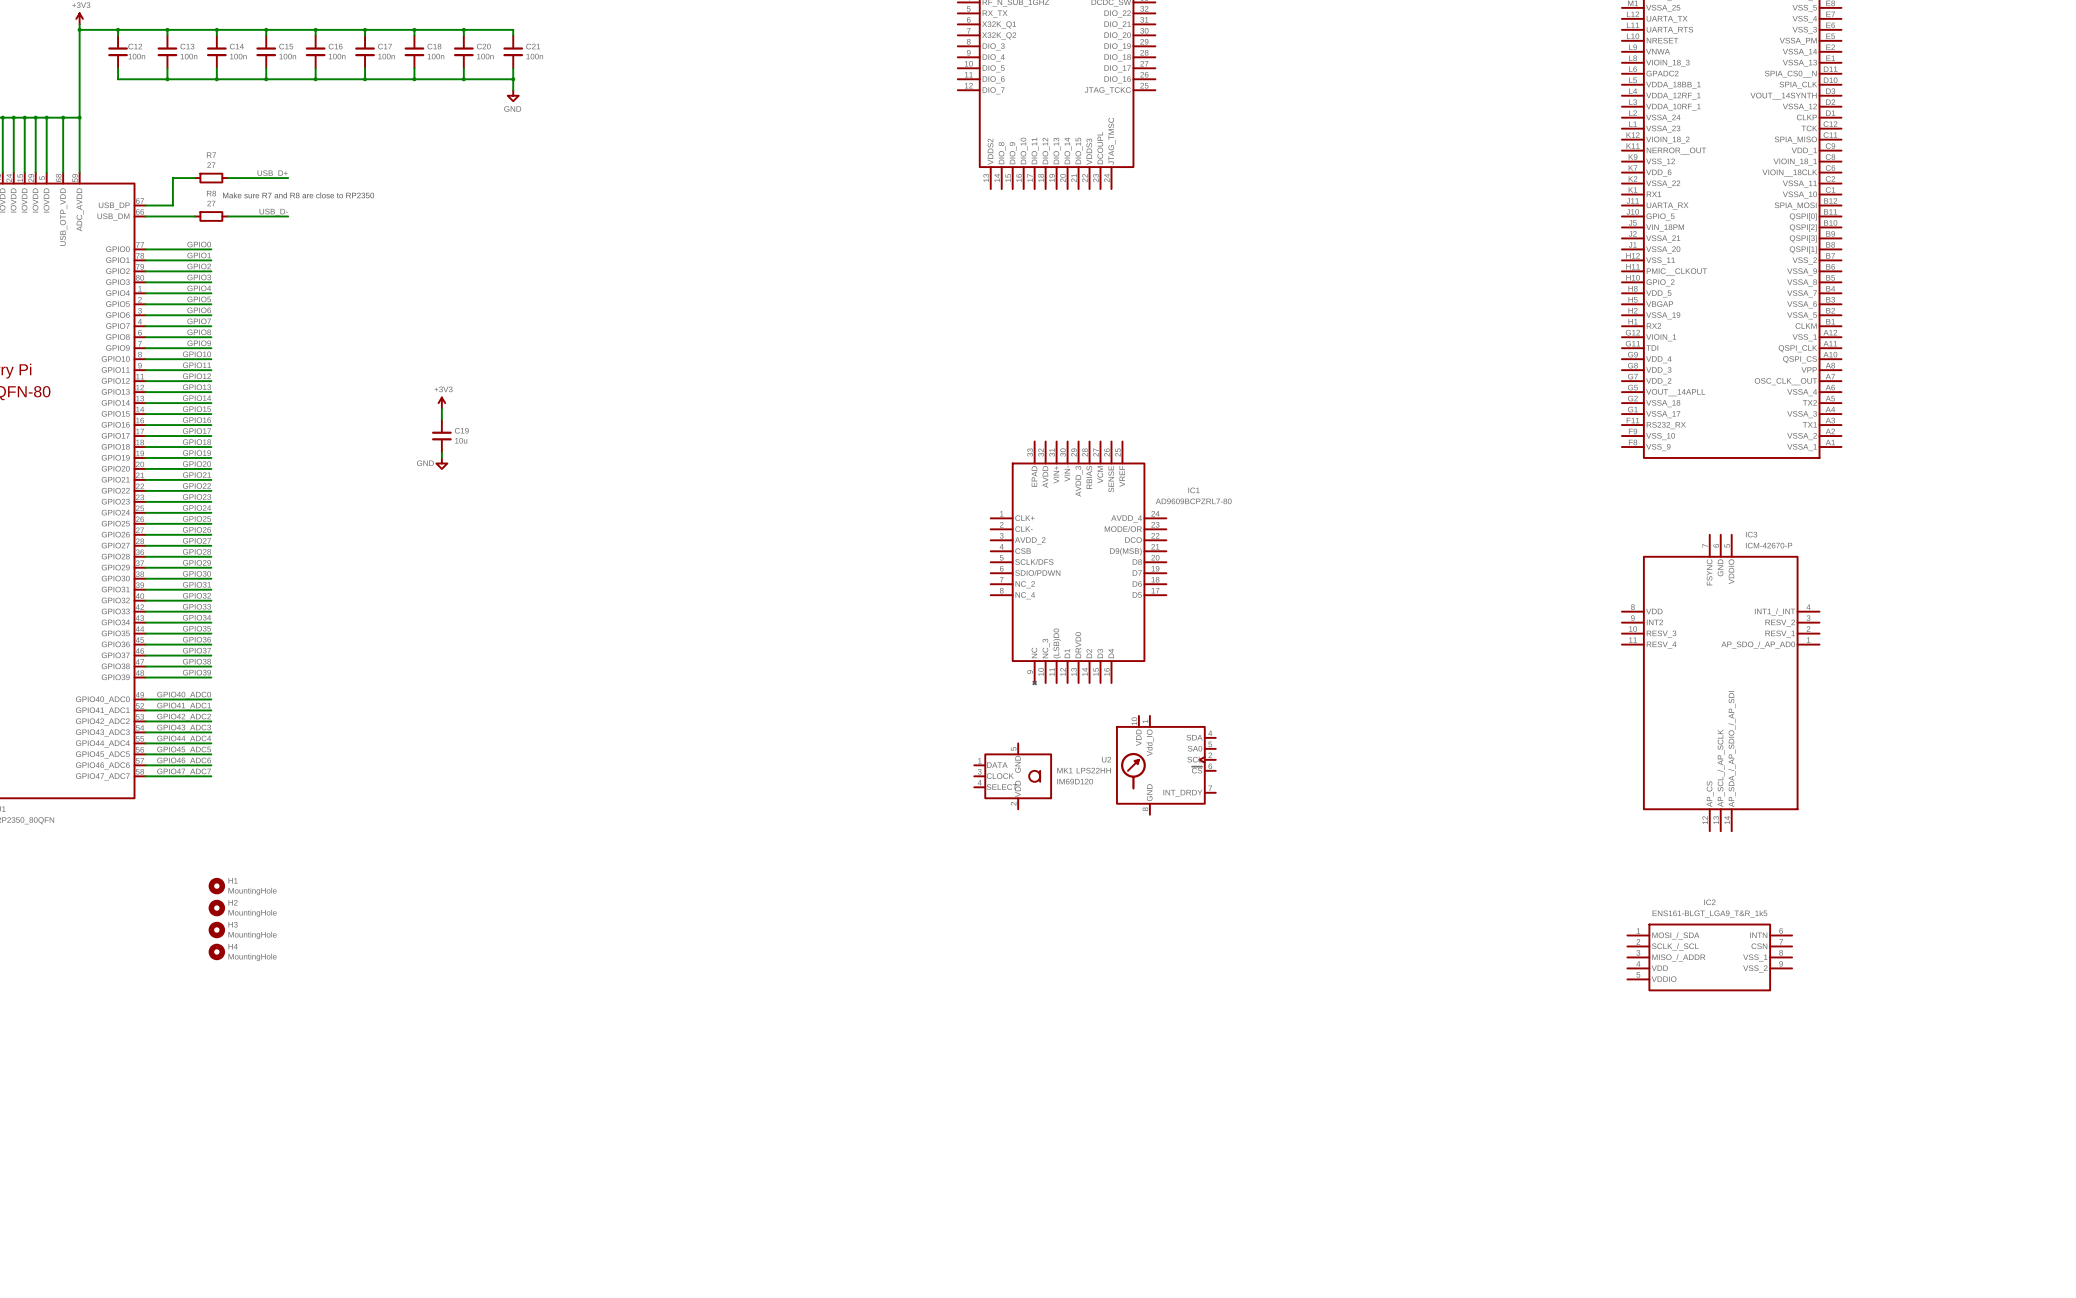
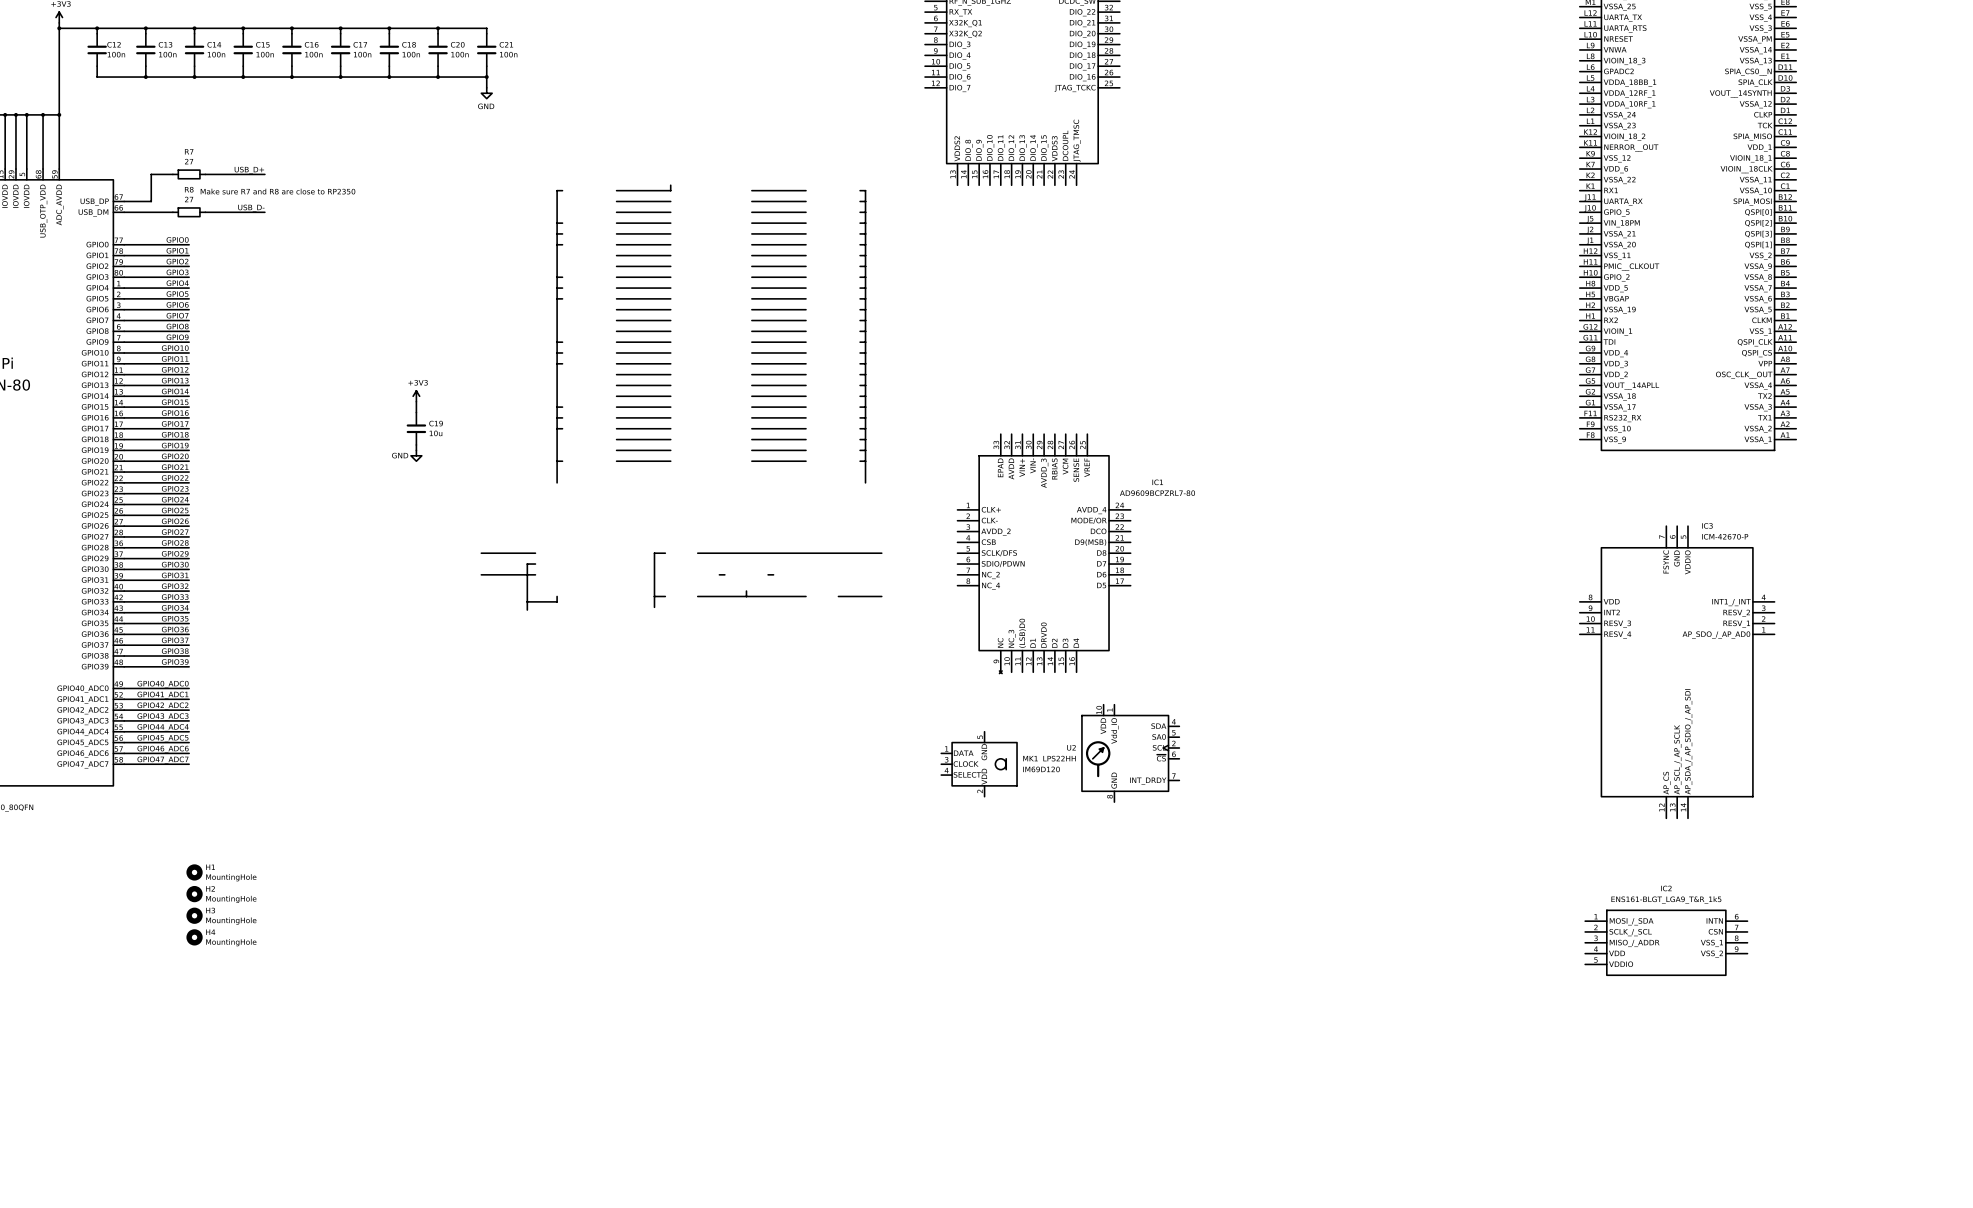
wire: none -> (670, 185) (670, 190) (616, 190)
wire: none -> (562, 190) (557, 190) (557, 482)
wire: none -> (751, 190) (805, 190)
wire: none -> (860, 190) (865, 190) (865, 482)
wire: none -> (616, 201) (670, 201)
wire: none -> (751, 201) (805, 201)
wire: none -> (860, 201) (865, 201)
wire: none -> (616, 212) (670, 212)
wire: none -> (751, 212) (805, 212)
wire: none -> (860, 212) (865, 212)
wire: none -> (557, 223) (562, 223)
wire: none -> (616, 223) (670, 223)
wire: none -> (751, 223) (805, 223)
wire: none -> (860, 223) (865, 223)
wire: none -> (557, 233) (562, 233)
wire: none -> (616, 233) (670, 233)
wire: none -> (751, 233) (805, 233)
wire: none -> (860, 233) (865, 233)
wire: none -> (557, 244) (562, 244)
wire: none -> (616, 244) (670, 244)
wire: none -> (751, 244) (805, 244)
wire: none -> (860, 244) (865, 244)
wire: none -> (616, 255) (670, 255)
wire: none -> (751, 255) (805, 255)
wire: none -> (860, 255) (865, 255)
wire: none -> (616, 266) (670, 266)
wire: none -> (751, 266) (805, 266)
wire: none -> (860, 266) (865, 266)
wire: none -> (557, 277) (562, 277)
wire: none -> (616, 277) (670, 277)
wire: none -> (751, 277) (805, 277)
wire: none -> (860, 277) (865, 277)
wire: none -> (557, 288) (562, 288)
wire: none -> (616, 288) (670, 288)
wire: none -> (751, 288) (805, 288)
wire: none -> (860, 288) (865, 288)
wire: none -> (557, 298) (562, 298)
wire: none -> (616, 298) (670, 298)
wire: none -> (751, 298) (805, 298)
wire: none -> (860, 298) (865, 298)
wire: none -> (616, 309) (670, 309)
wire: none -> (751, 309) (805, 309)
wire: none -> (860, 309) (865, 309)
wire: none -> (616, 320) (670, 320)
wire: none -> (751, 320) (805, 320)
wire: none -> (860, 320) (865, 320)
wire: none -> (616, 331) (670, 331)
wire: none -> (751, 331) (805, 331)
wire: none -> (860, 331) (865, 331)
wire: none -> (557, 342) (562, 342)
wire: none -> (616, 342) (670, 342)
wire: none -> (751, 342) (805, 342)
wire: none -> (860, 342) (865, 342)
wire: none -> (557, 352) (562, 352)
wire: none -> (616, 352) (670, 352)
wire: none -> (751, 352) (805, 352)
wire: none -> (860, 352) (865, 352)
wire: none -> (557, 363) (562, 363)
wire: none -> (616, 363) (670, 363)
wire: none -> (751, 363) (805, 363)
wire: none -> (860, 363) (865, 363)
wire: none -> (616, 374) (670, 374)
wire: none -> (751, 374) (805, 374)
wire: none -> (860, 374) (865, 374)
wire: none -> (616, 385) (670, 385)
wire: none -> (751, 385) (805, 385)
wire: none -> (860, 385) (865, 385)
wire: none -> (616, 396) (670, 396)
wire: none -> (751, 396) (805, 396)
wire: none -> (860, 396) (865, 396)
wire: none -> (557, 407) (562, 407)
wire: none -> (616, 407) (670, 407)
wire: none -> (751, 407) (805, 407)
wire: none -> (860, 407) (865, 407)
wire: none -> (557, 417) (562, 417)
wire: none -> (616, 417) (670, 417)
wire: none -> (751, 417) (805, 417)
wire: none -> (860, 417) (865, 417)
wire: none -> (557, 428) (562, 428)
wire: none -> (616, 428) (670, 428)
wire: none -> (751, 428) (805, 428)
wire: none -> (860, 428) (865, 428)
wire: none -> (616, 439) (670, 439)
wire: none -> (751, 439) (805, 439)
wire: none -> (860, 439) (865, 439)
wire: none -> (616, 450) (670, 450)
wire: none -> (751, 450) (805, 450)
wire: none -> (860, 450) (865, 450)
wire: none -> (557, 461) (562, 461)
wire: none -> (616, 461) (670, 461)
wire: none -> (751, 461) (805, 461)
wire: none -> (860, 461) (865, 461)
wire: none -> (481, 553) (535, 553)
wire: none -> (665, 553) (654, 553) (654, 607)
wire: none -> (697, 553) (881, 553)
wire: none -> (535, 564) (527, 564) (527, 610)
wire: none -> (481, 574) (535, 574)
wire: none -> (719, 574) (724, 574)
wire: none -> (768, 574) (773, 574)
wire: none -> (746, 591) (746, 596)
wire: none -> (557, 596) (557, 601) (527, 601)
wire: none -> (654, 596) (665, 596)
wire: none -> (697, 596) (805, 596)
wire: none -> (838, 596) (881, 596)

